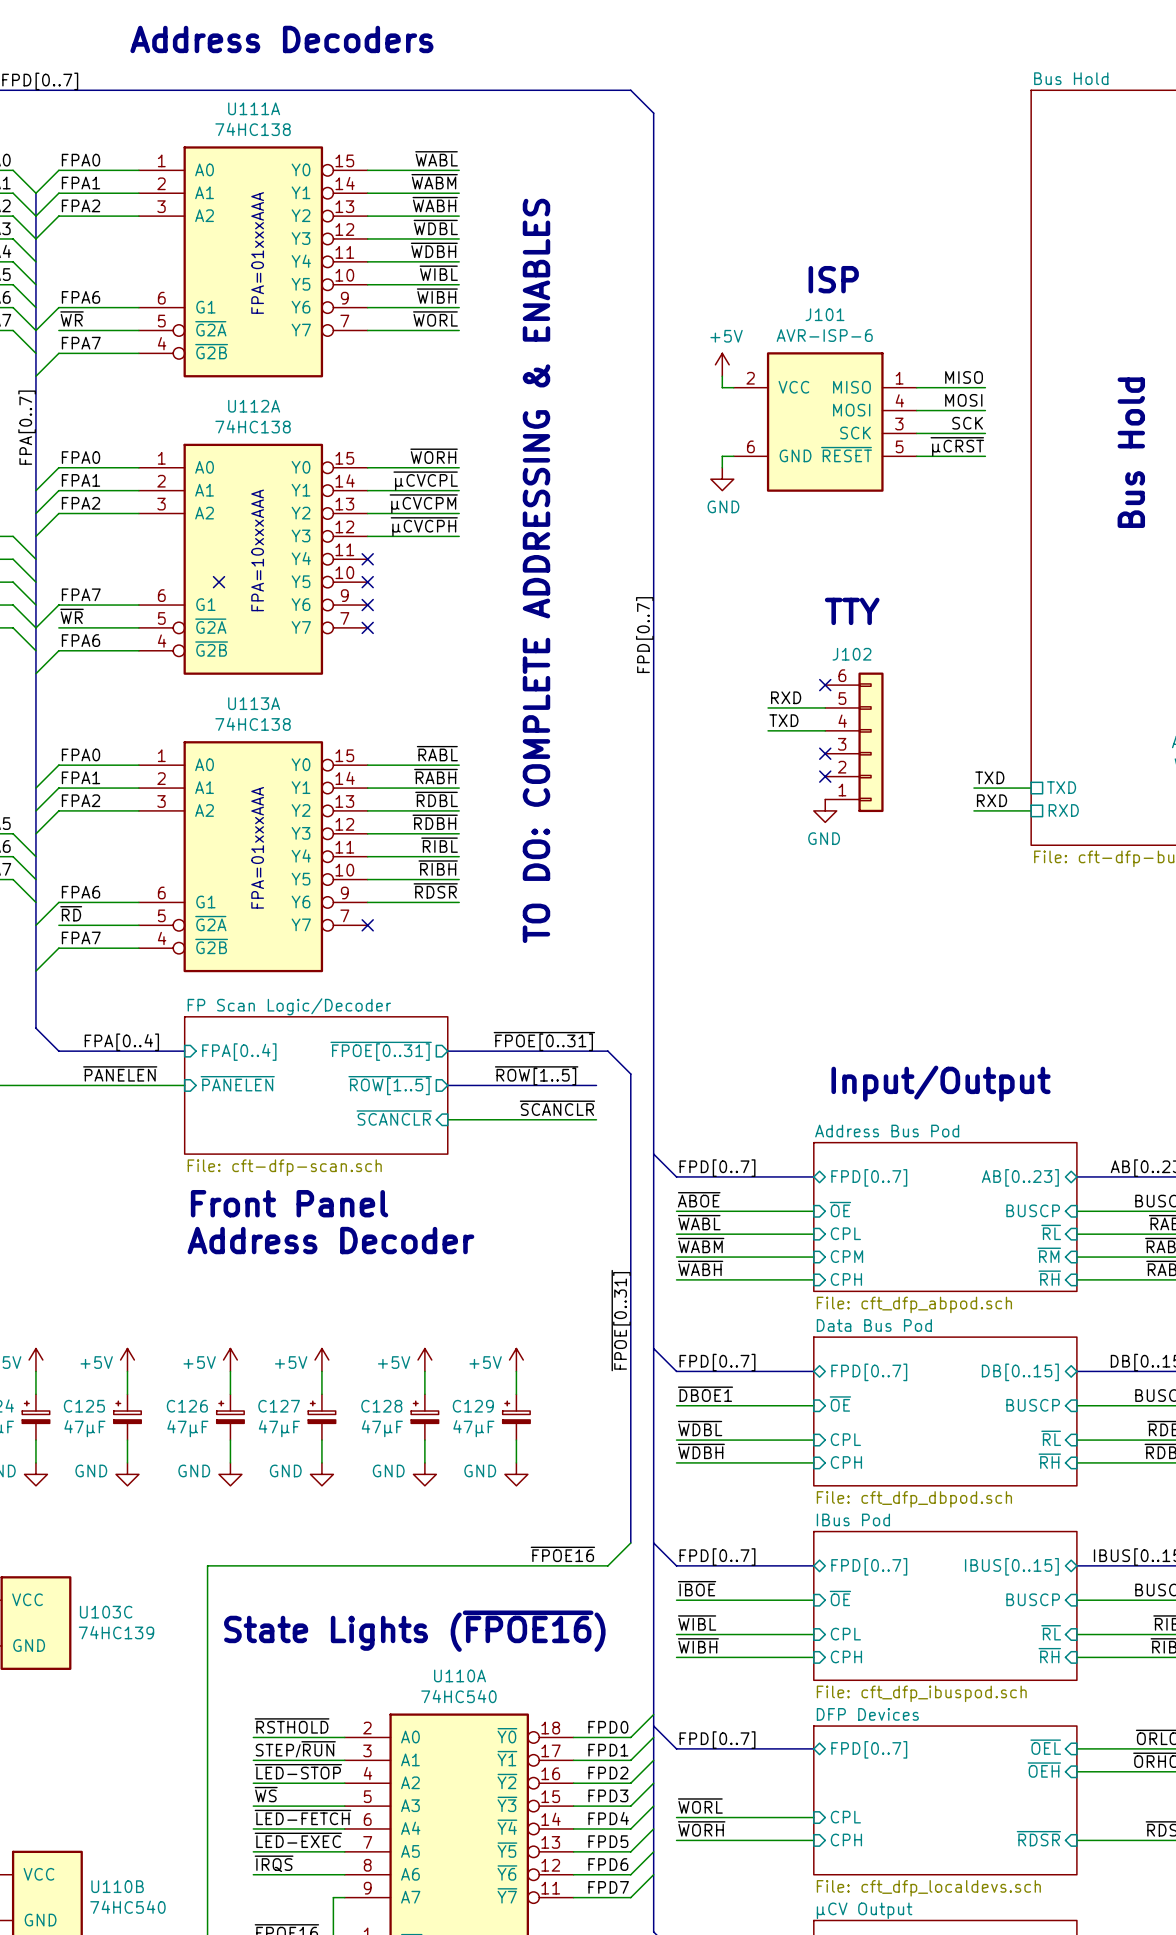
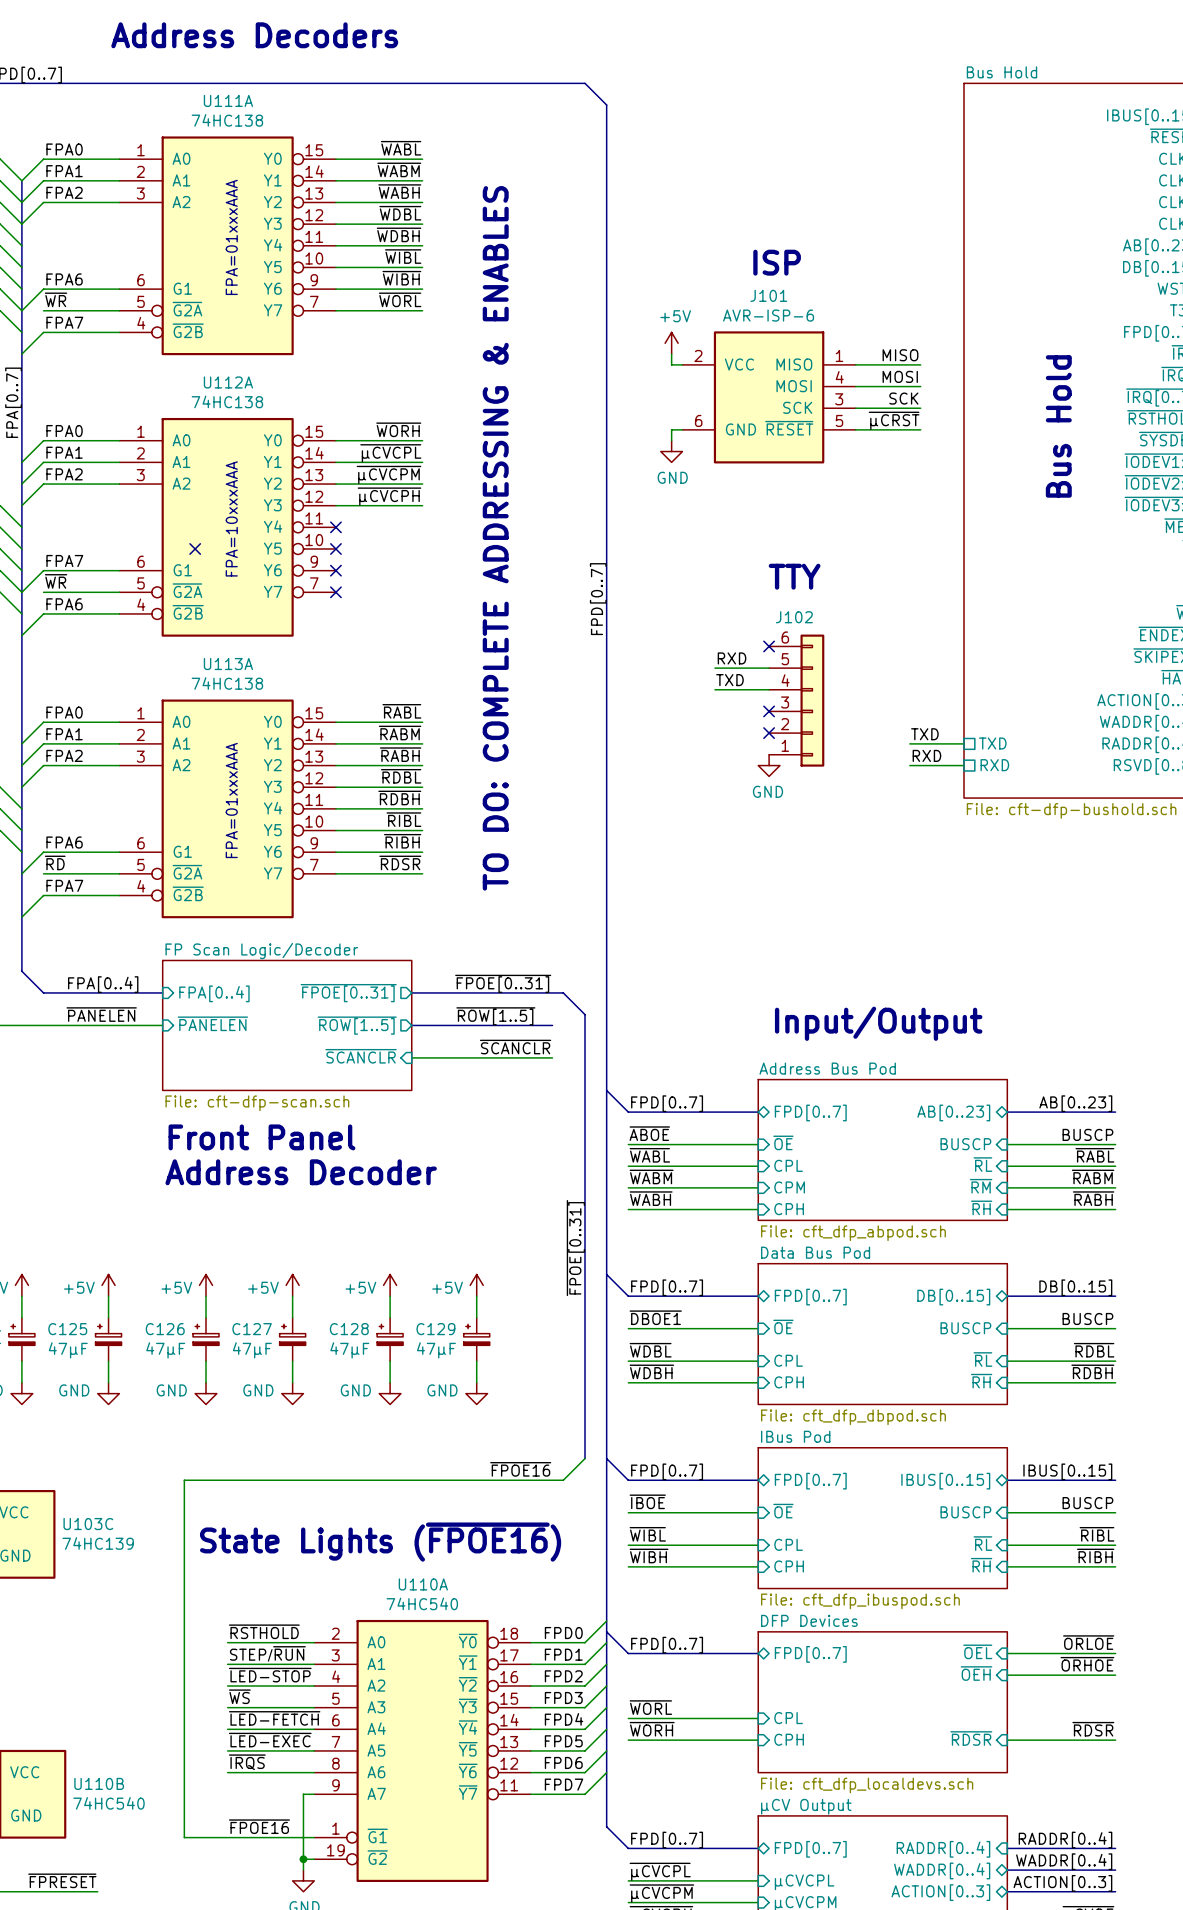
label: ~{RABH} (435, 776) -> ~{RABM} (400, 733)
label: ~{RDBL} (436, 799) -> ~{RABH} (400, 754)
label: ~{RDBH} (435, 822) -> ~{RDBL} (401, 776)
label: ~{RIBL} (439, 845) -> ~{RDBH} (399, 797)
label: ~{RIBH} (438, 868) -> ~{RIBL} (403, 819)
label: ~{RDSR} (435, 890) -> ~{RIBH} (402, 841)
label: none -> ~{RDSR} (400, 862)
wire: none -> (335, 873) (422, 873)
no-connect mark: (367, 925) -> none

